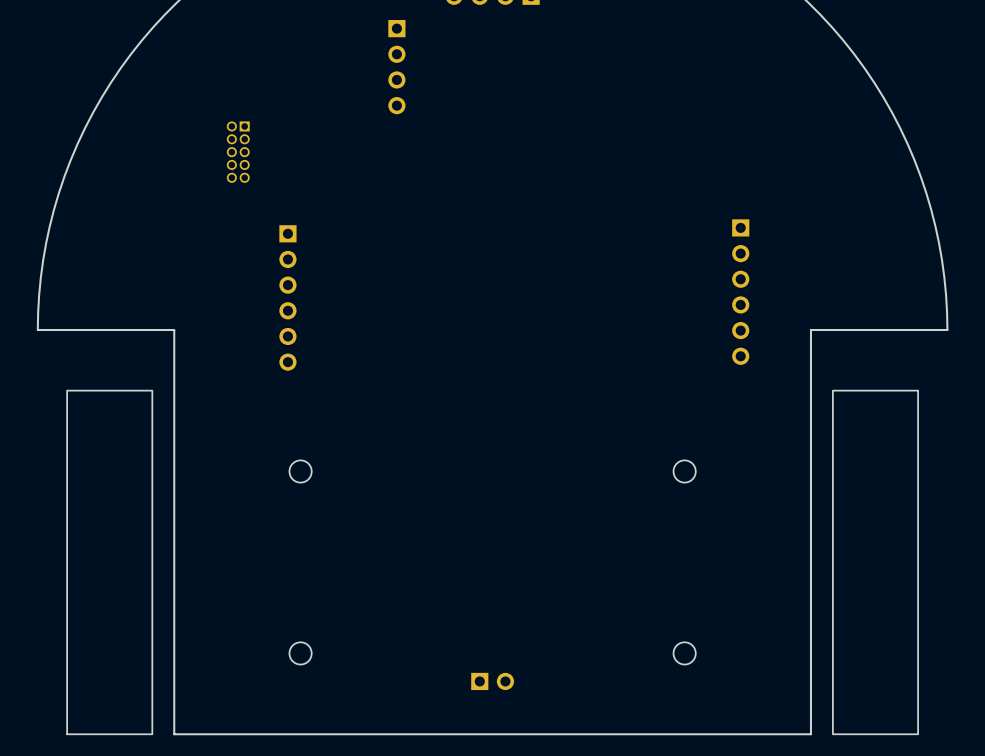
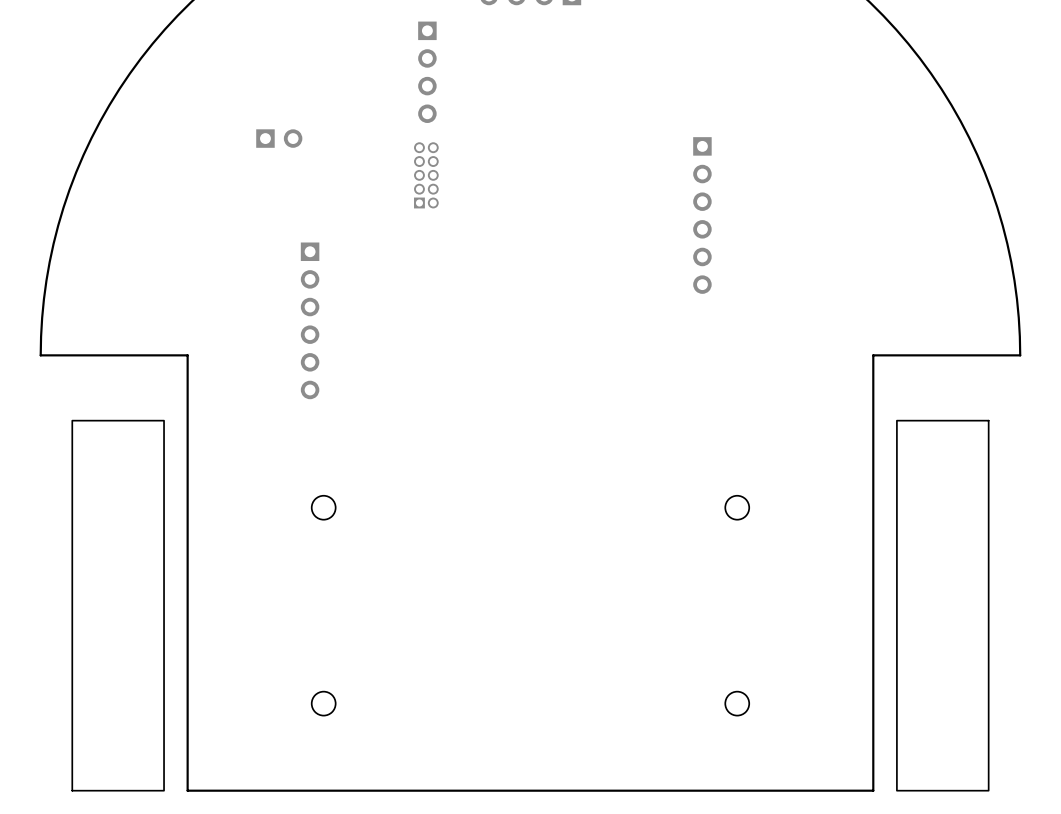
part: none -> (279, 138)
part rotation: 0° (238, 152) -> 180° (426, 175)
part position: (238, 152) -> (426, 175)
part position: (740, 292) -> (702, 215)
part: (492, 681) -> none

